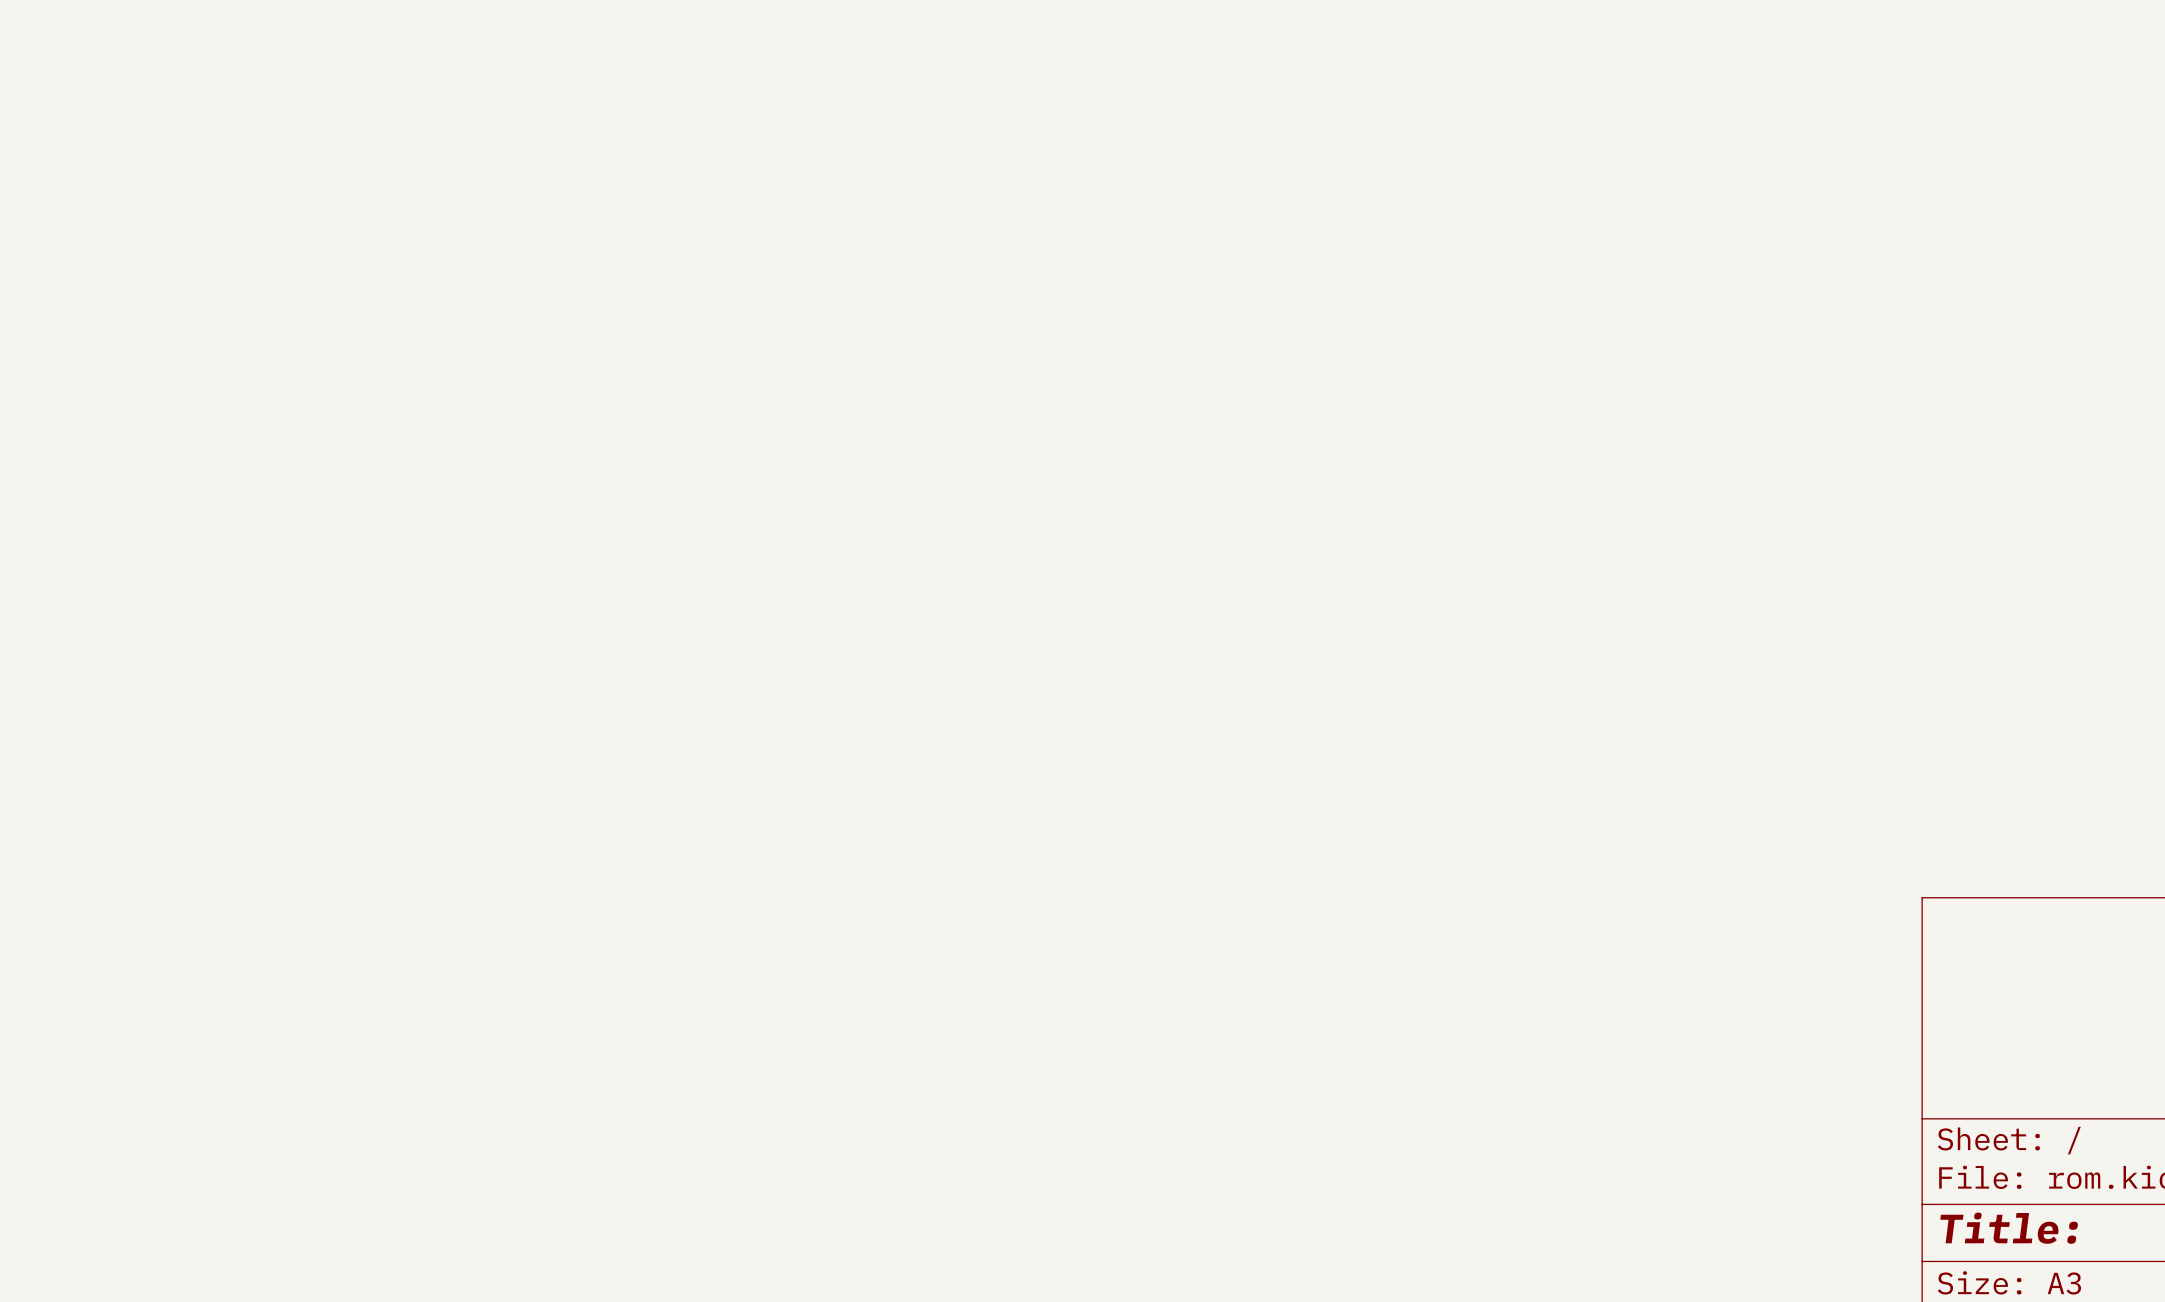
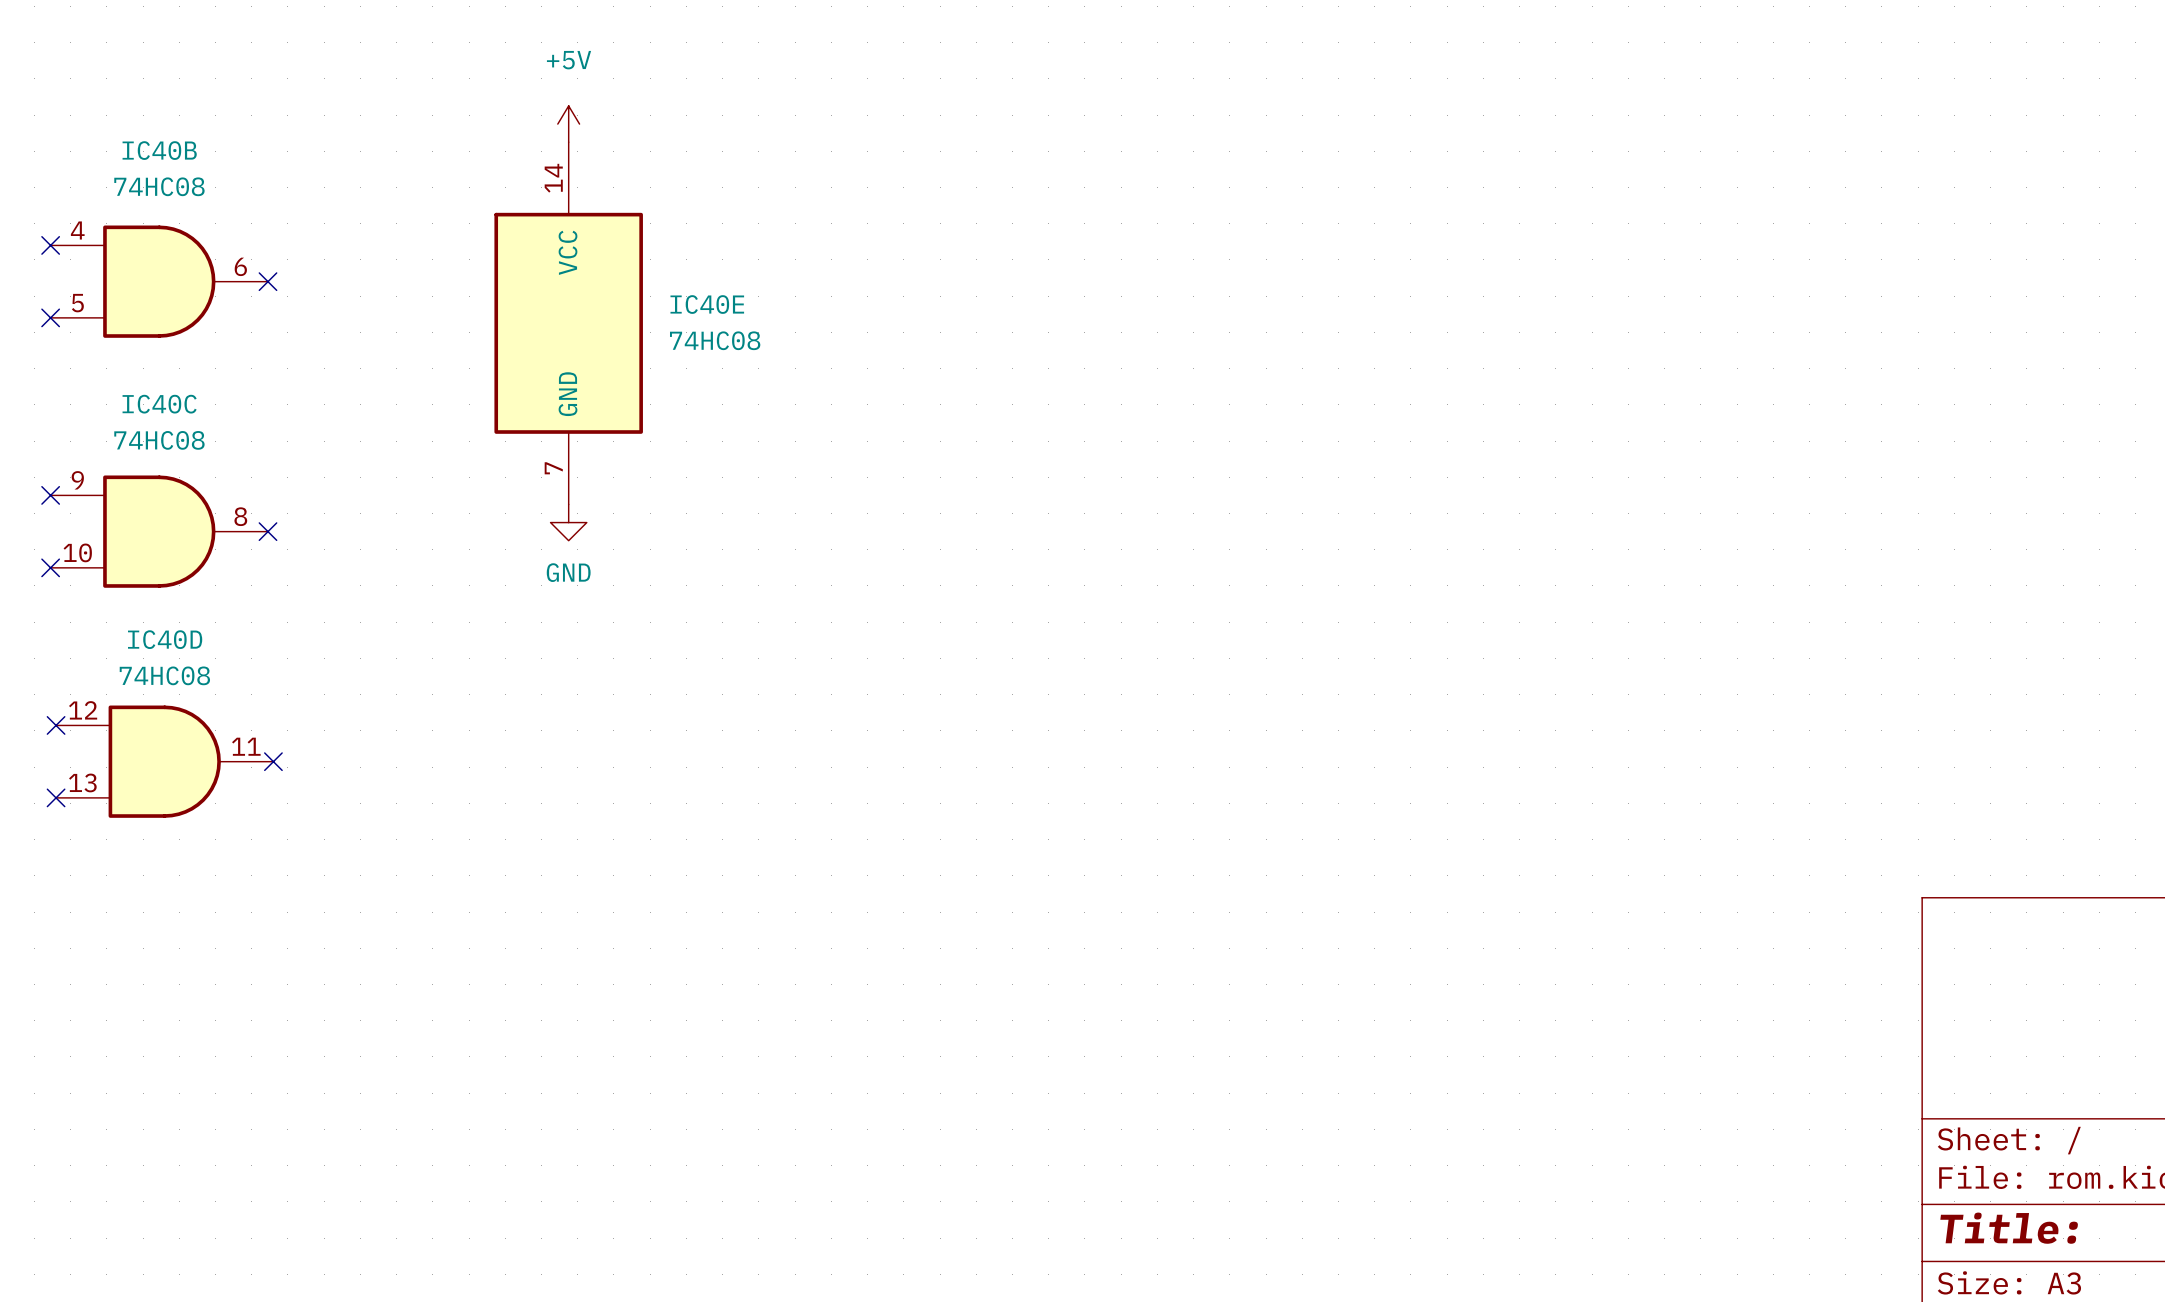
power symbol: none -> +5V (568, 124)
no-connect mark: none -> (50, 245)
IC40B: none -> 74HC08 (159, 281)
no-connect mark: none -> (267, 281)
no-connect mark: none -> (50, 317)
IC40E: none -> 74HC08 (568, 323)
no-connect mark: none -> (50, 495)
power symbol: none -> GND (568, 522)
IC40C: none -> 74HC08 (159, 531)
no-connect mark: none -> (267, 531)
no-connect mark: none -> (50, 567)
no-connect mark: none -> (56, 725)
IC40D: none -> 74HC08 (164, 761)
no-connect mark: none -> (273, 761)
no-connect mark: none -> (56, 797)

